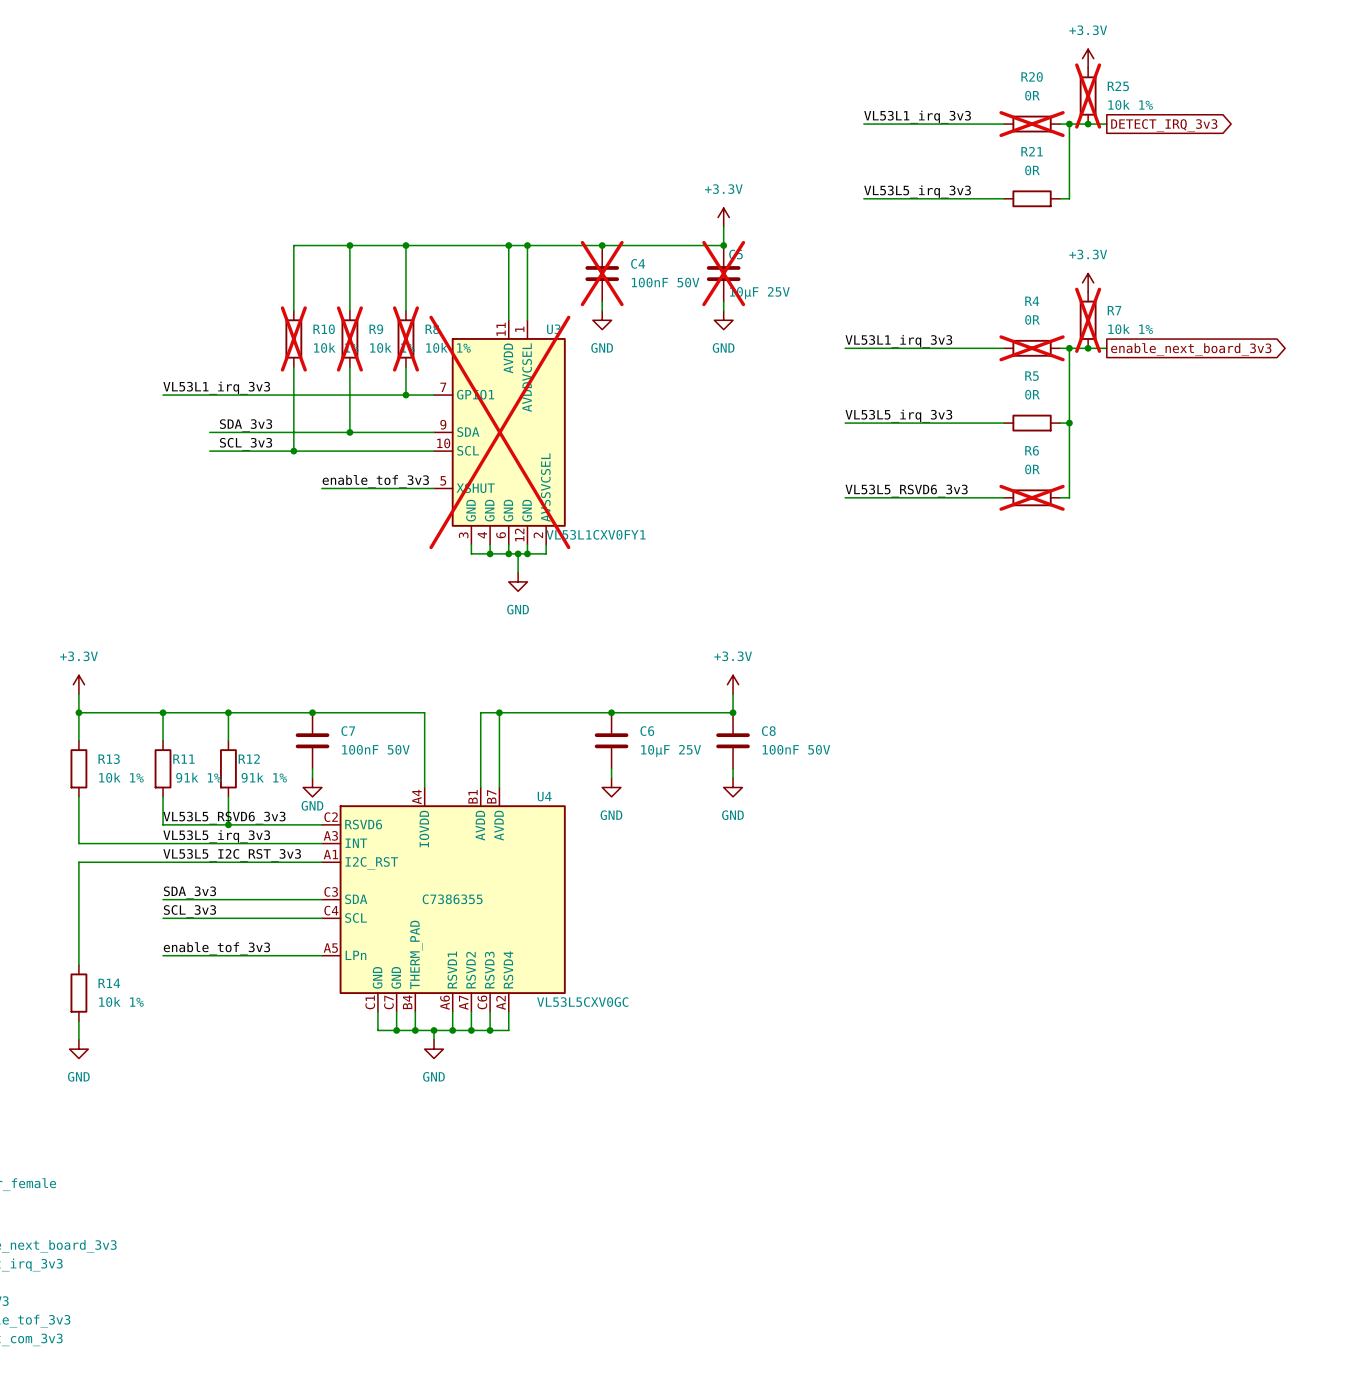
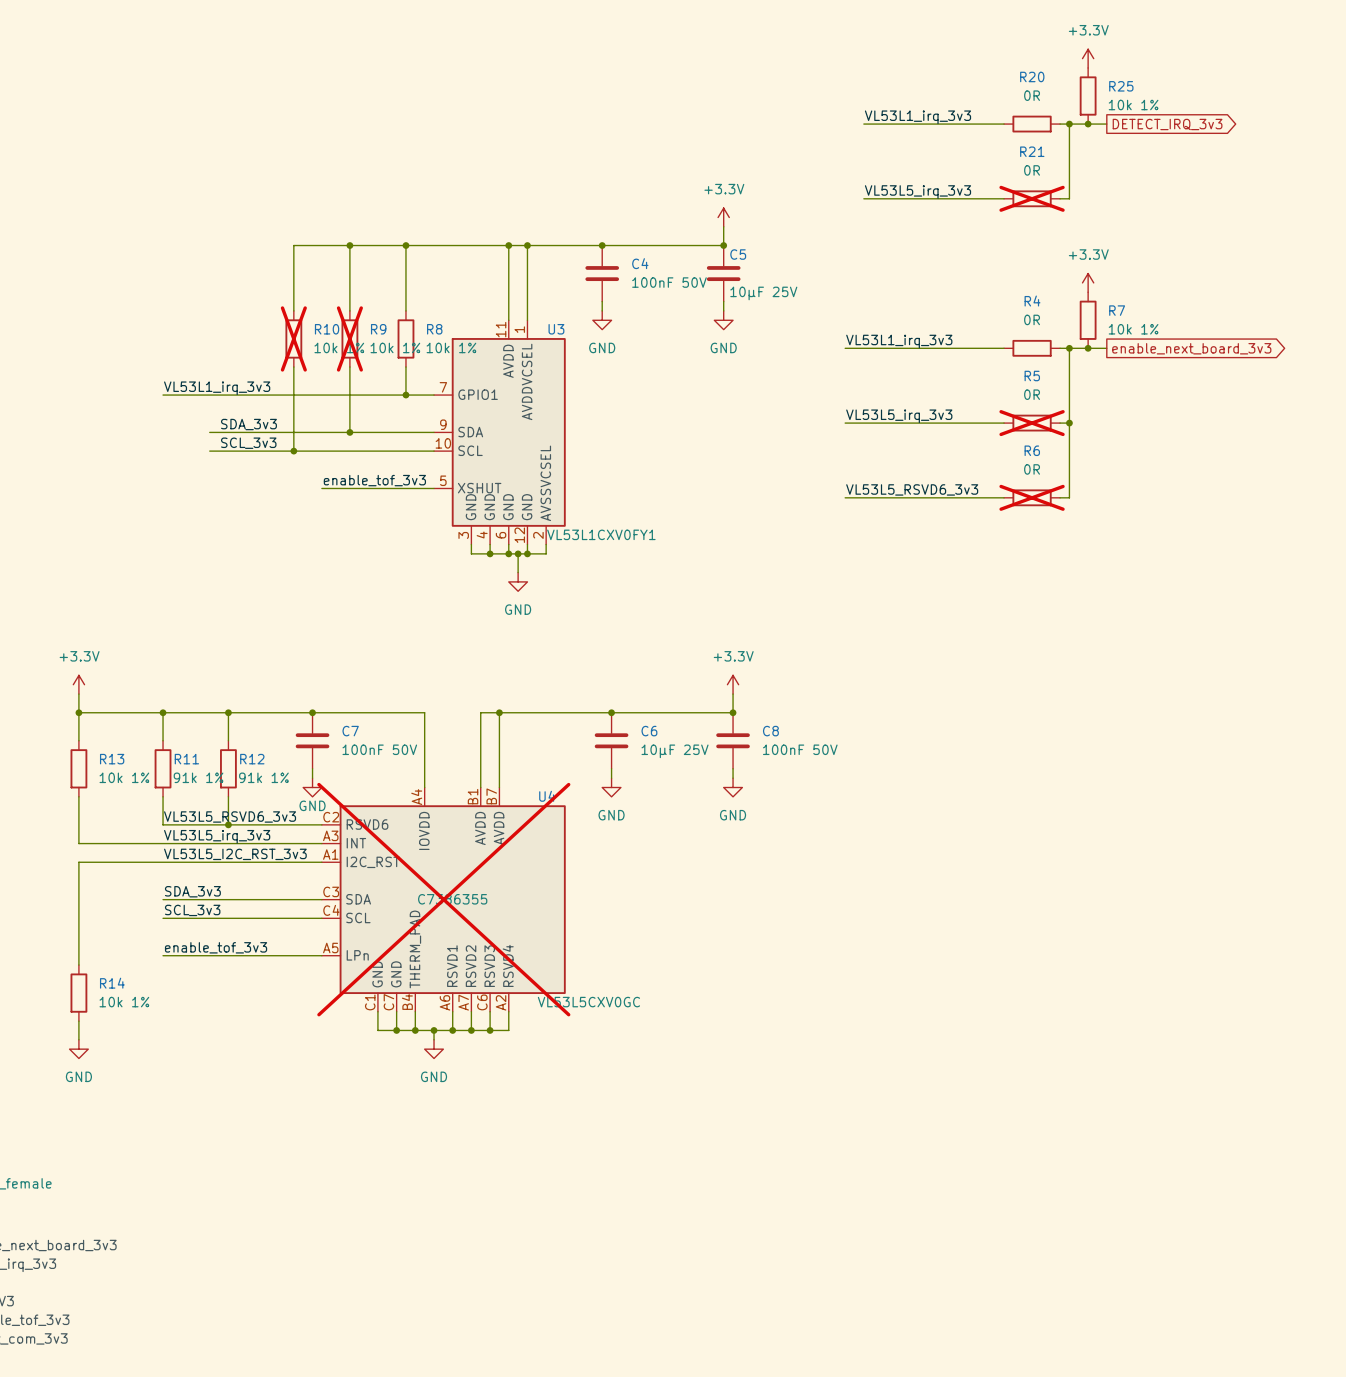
R25 do-not-place cross: (1088, 96) -> none
R20 do-not-place cross: (1032, 124) -> none
R21 do-not-place cross: none -> (1032, 198)
C4 do-not-place cross: (602, 273) -> none
C5 do-not-place cross: (723, 273) -> none
R7 do-not-place cross: (1088, 320) -> none
R8 do-not-place cross: (405, 338) -> none
R4 do-not-place cross: (1032, 348) -> none
R5 do-not-place cross: none -> (1032, 423)
U3 do-not-place cross: (499, 432) -> none
U4 do-not-place cross: none -> (443, 899)

